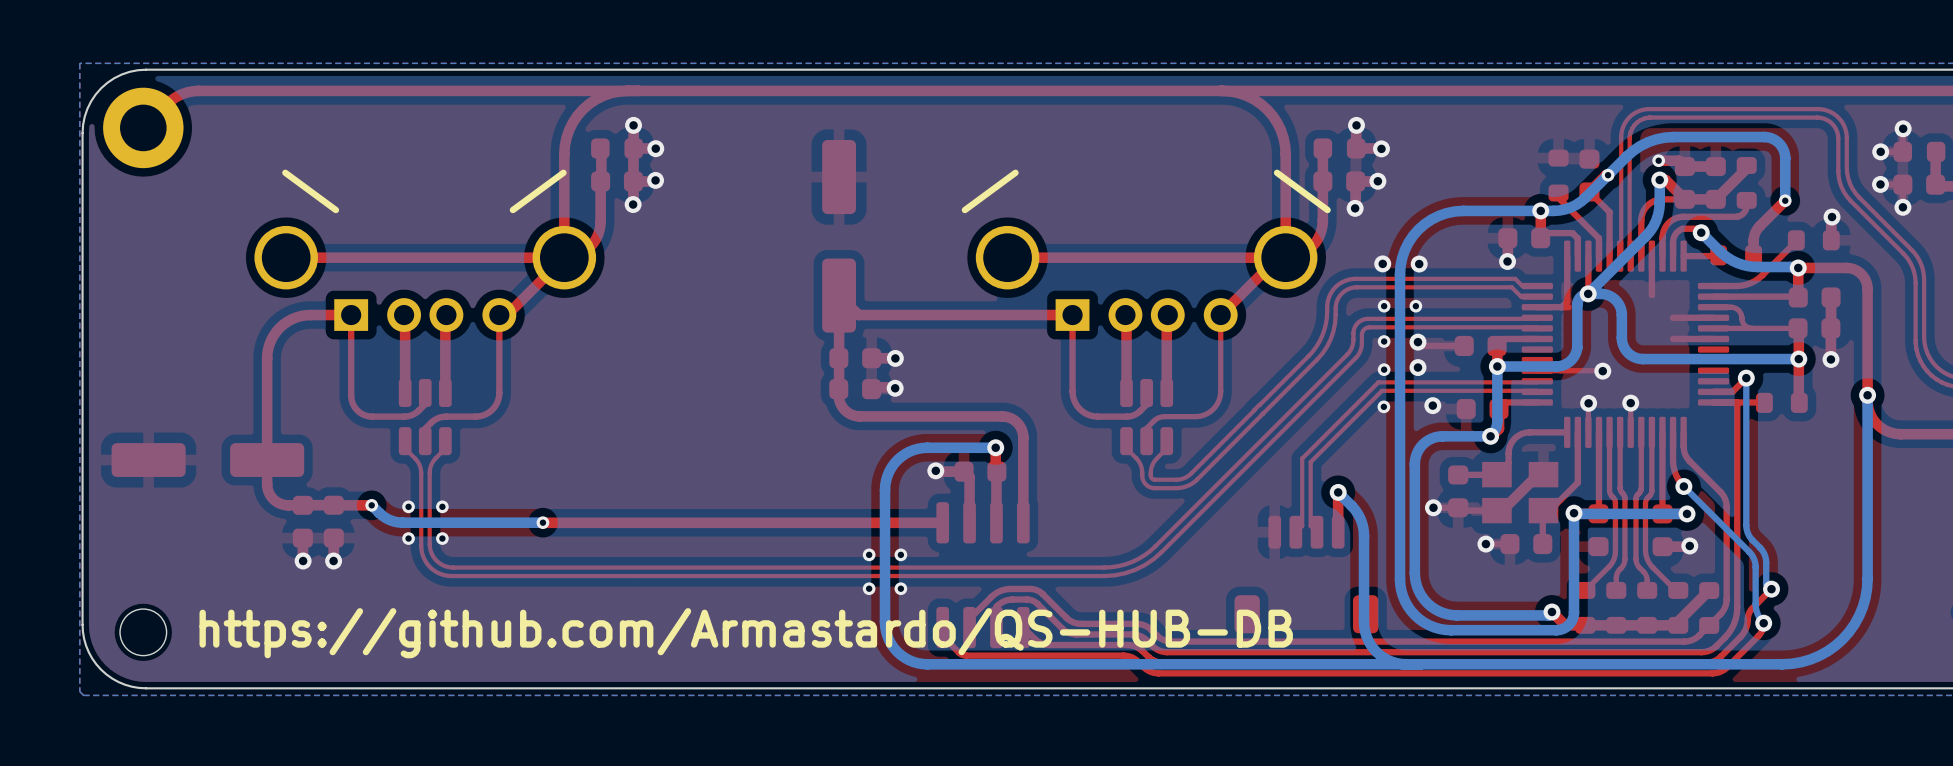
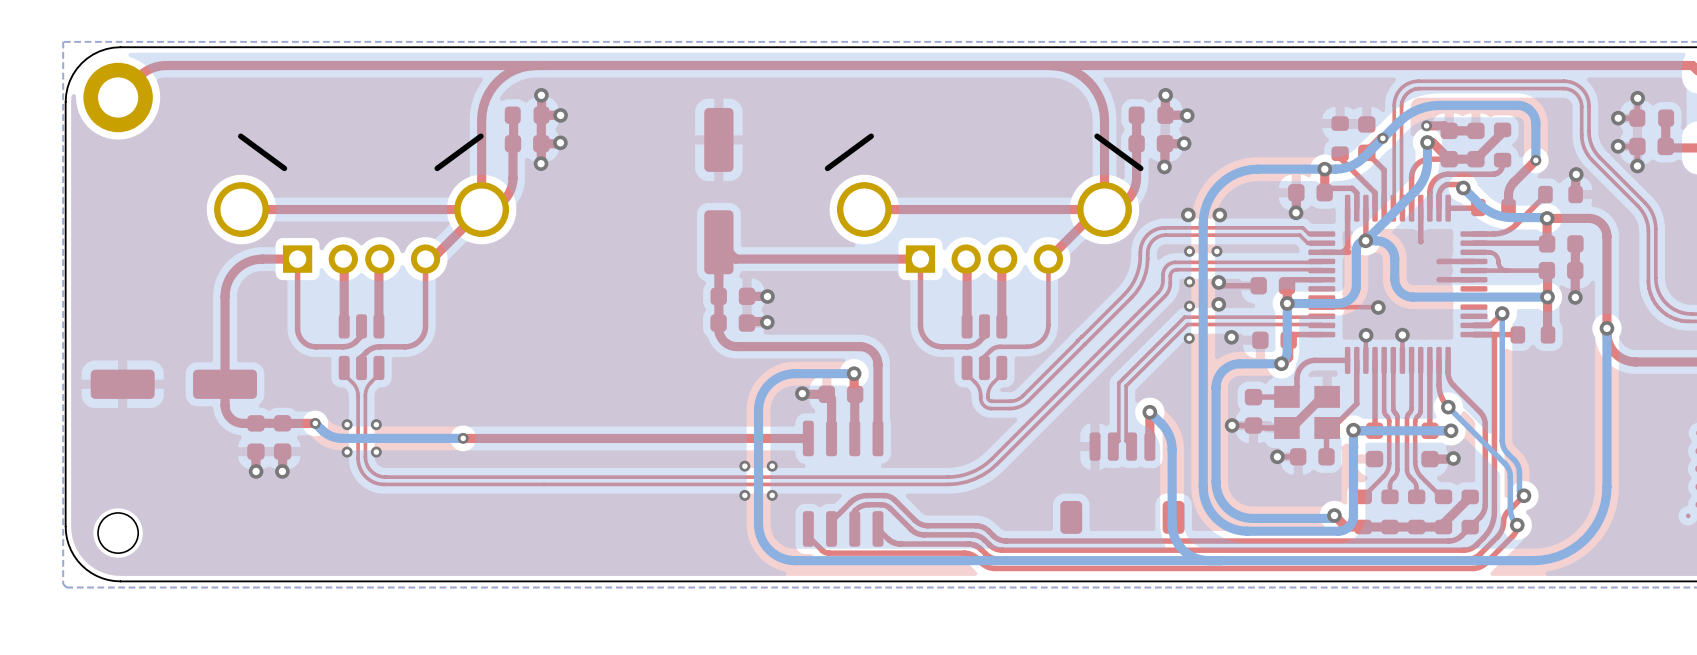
text: https://github.com/Armastardo/QS-HUB-DB (746, 633) -> none

